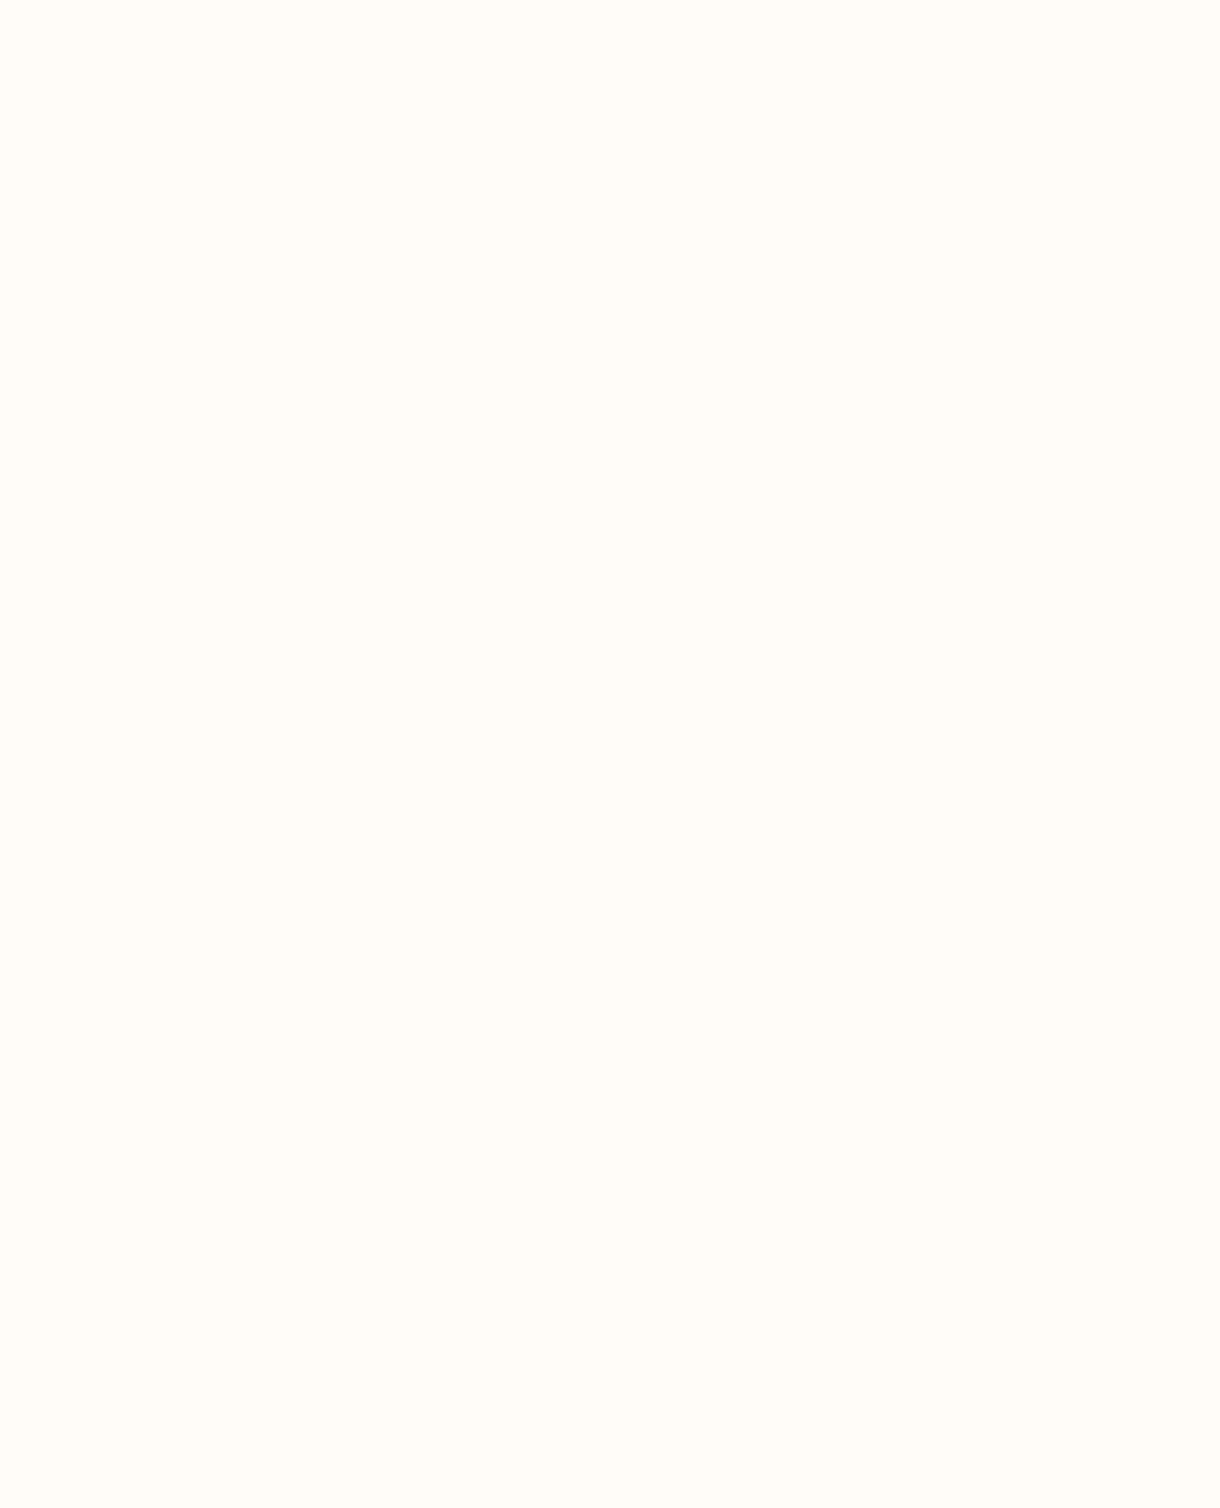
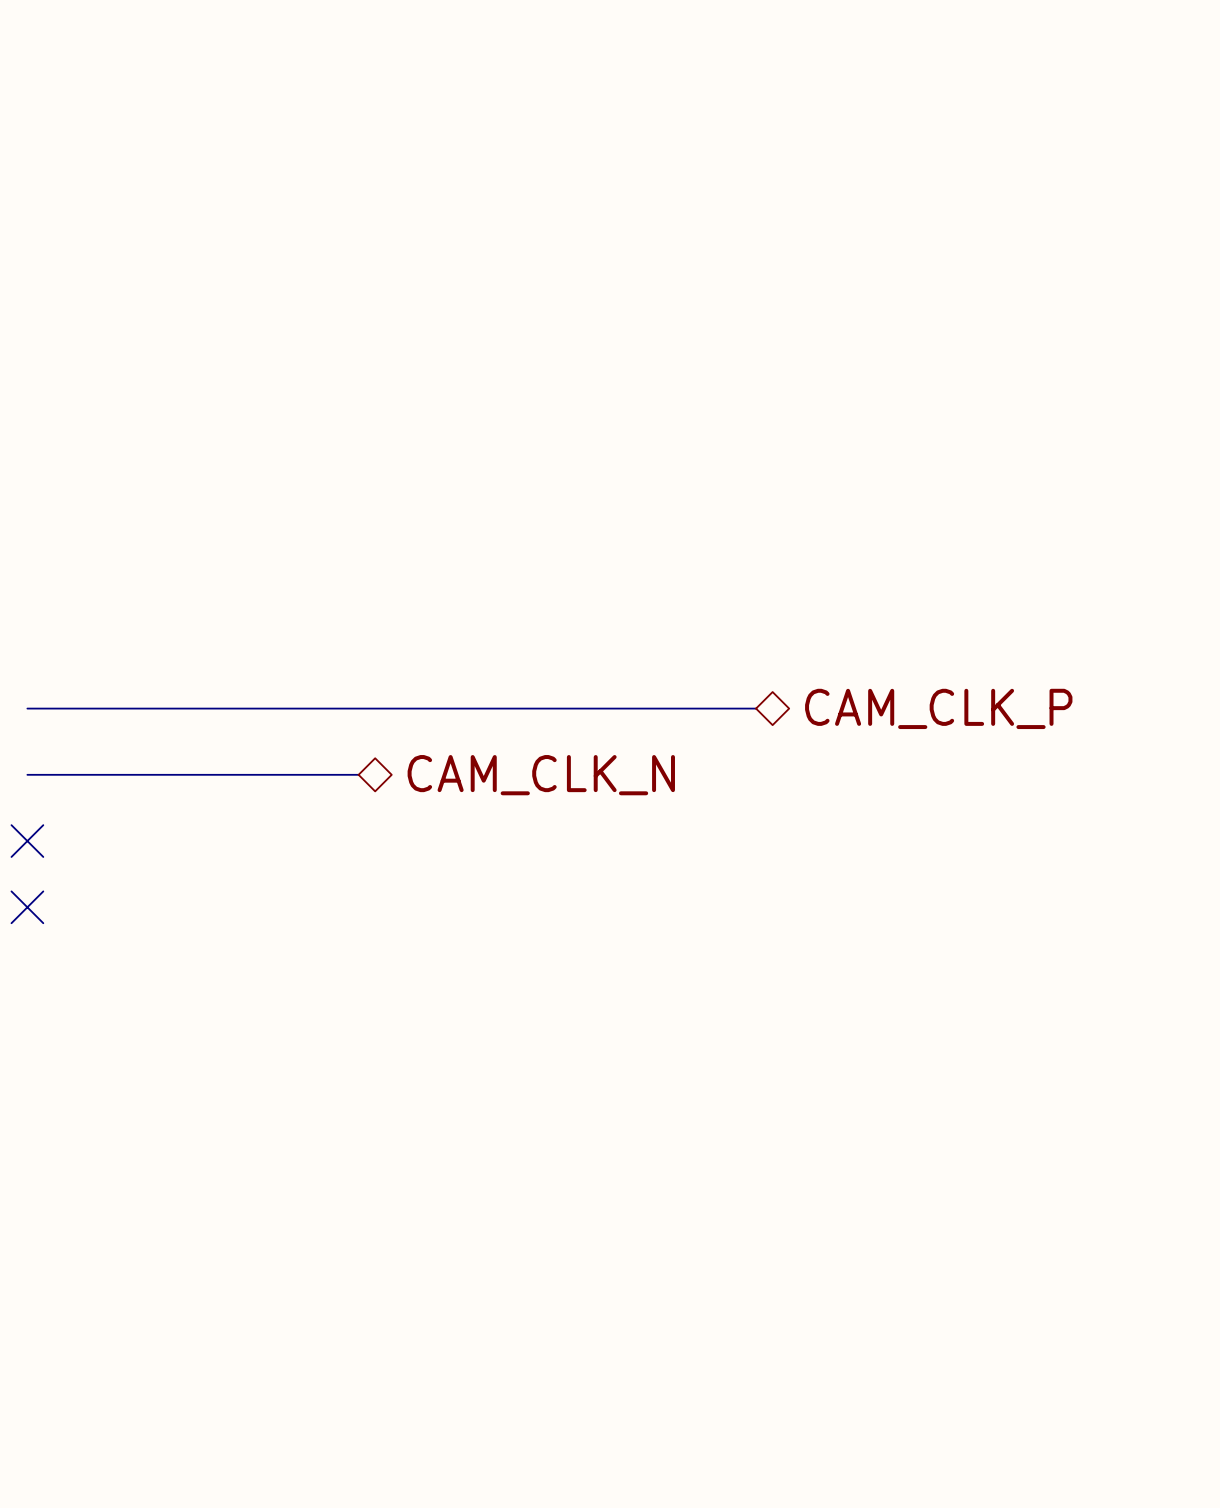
wire: none -> (27, 708) (756, 708)
hierarchical label: none -> CAM_CLK_P (938, 708)
wire: none -> (27, 774) (358, 774)
hierarchical label: none -> CAM_CLK_N (541, 775)
no-connect mark: none -> (27, 841)
no-connect mark: none -> (27, 907)

